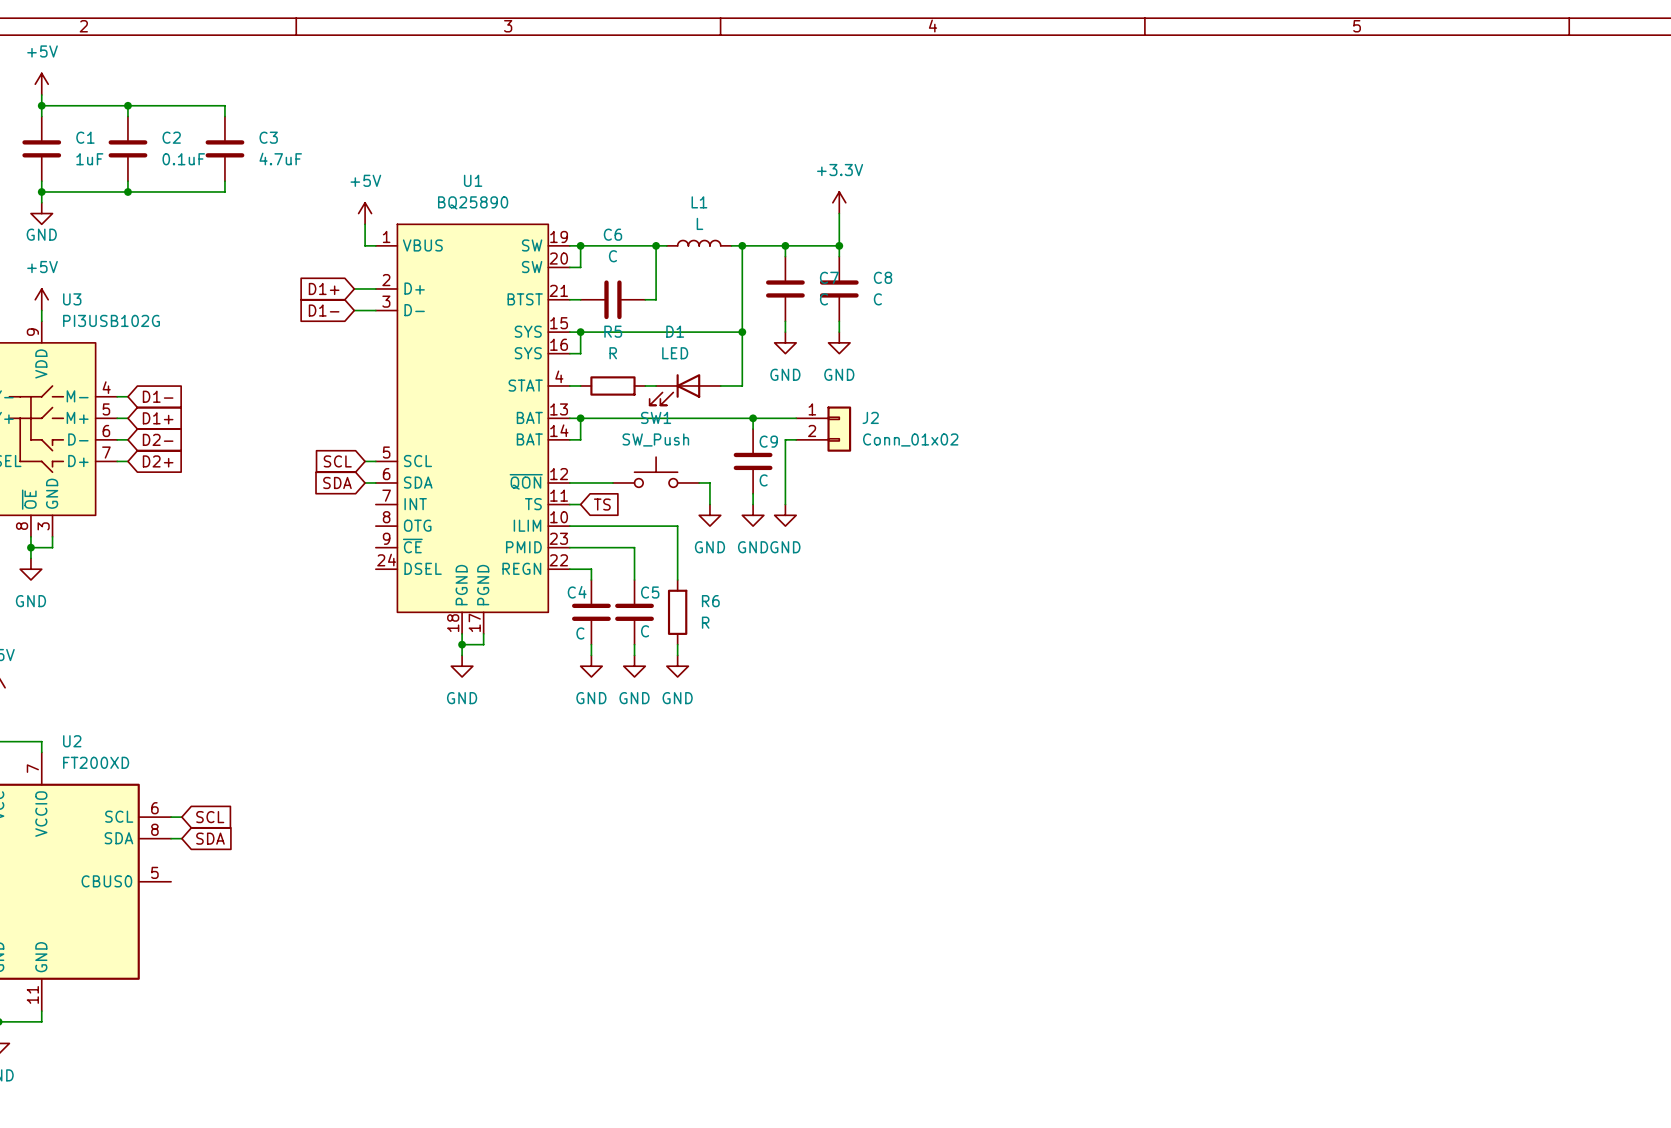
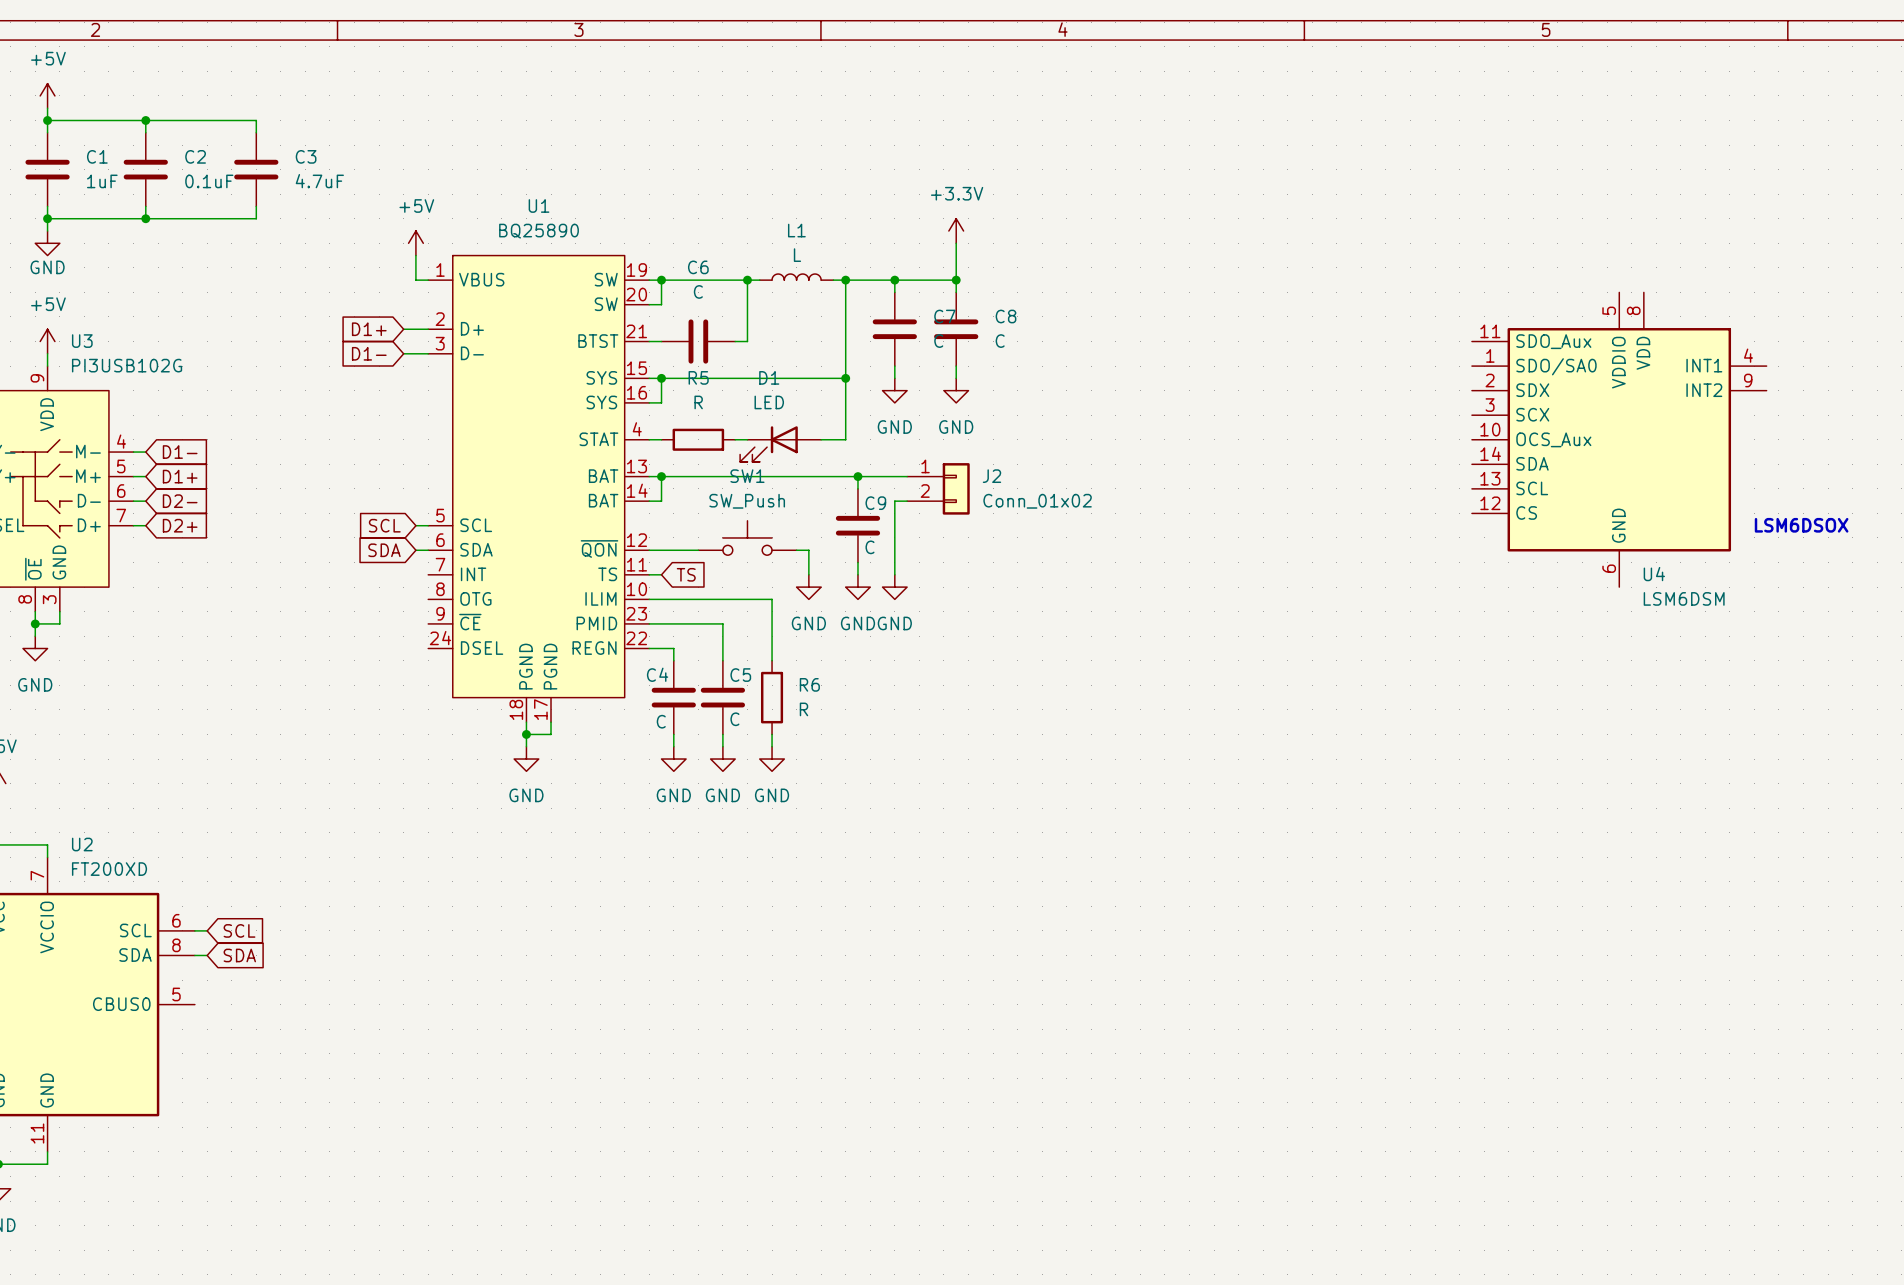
U4: none -> LSM6DSM (1619, 439)
text: none -> LSM6DSOX (1801, 525)

